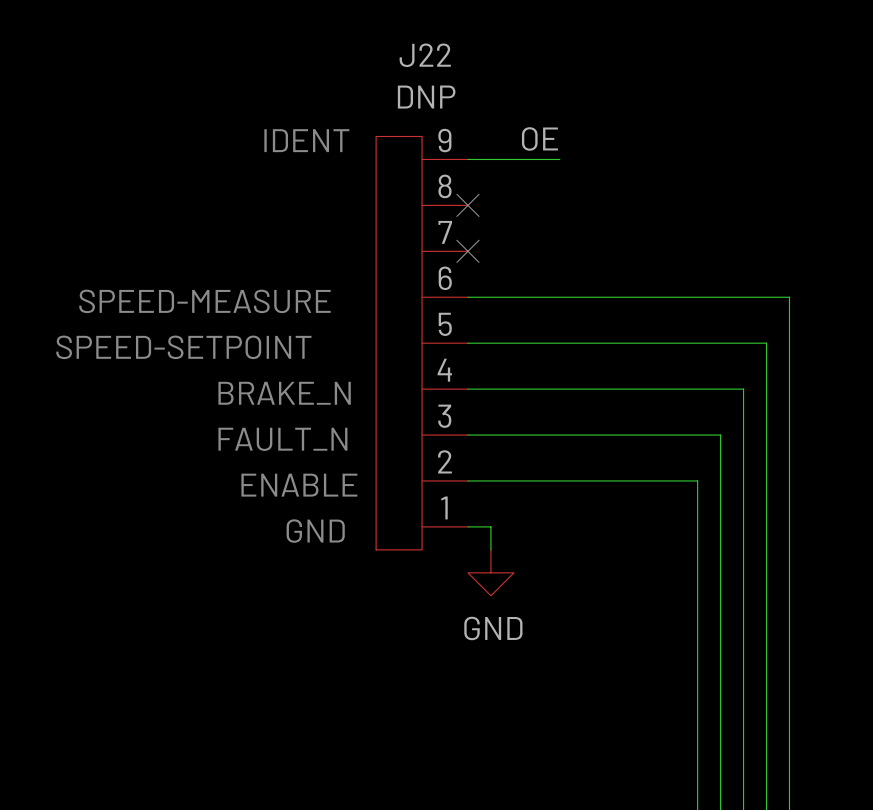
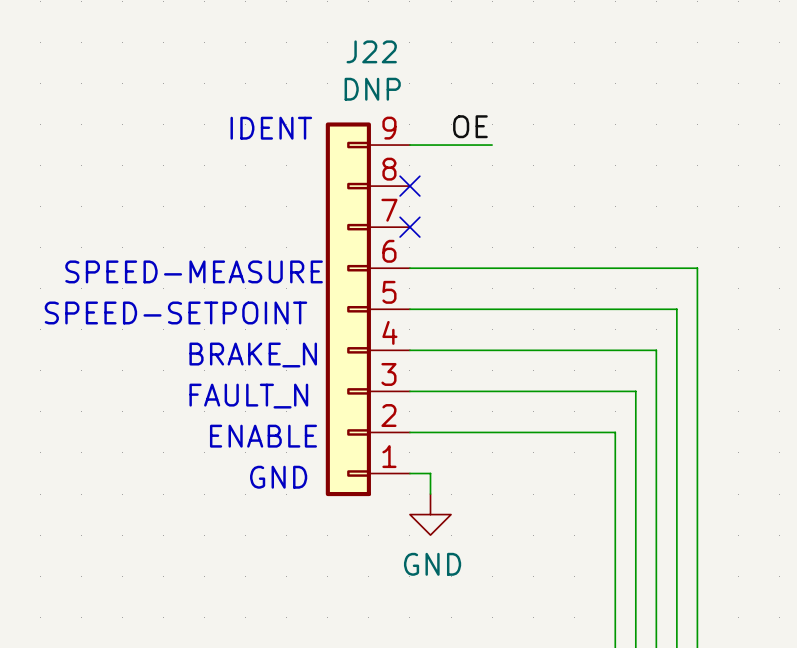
J22 symbol: [376, 136, 468, 550] -> [325, 122, 410, 497]

